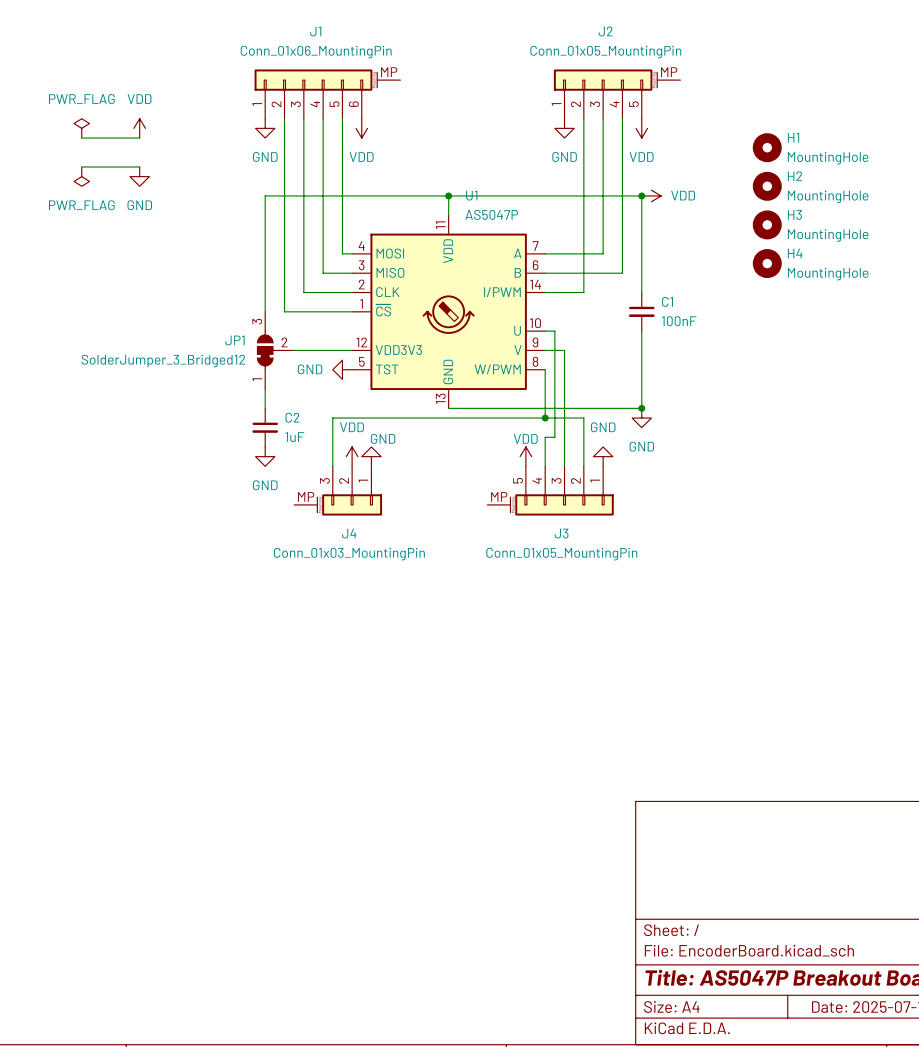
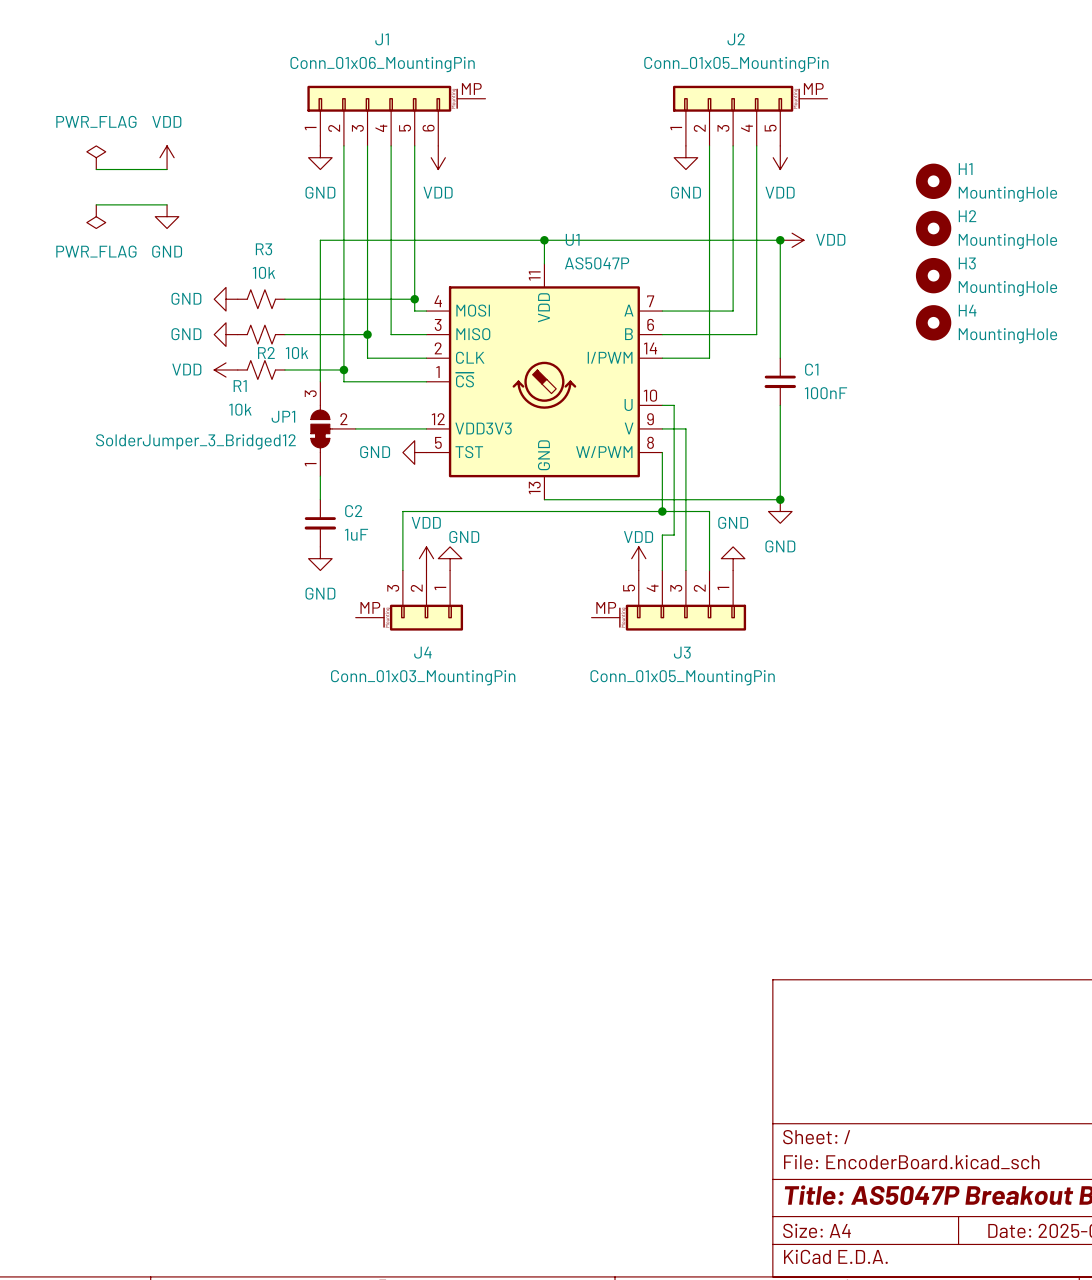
power symbol: none -> GND (226, 299)
R3: none -> 10k (261, 299)
wire: none -> (284, 299) (414, 299)
junction: none -> (414, 299)
power symbol: none -> GND (226, 334)
R2: none -> 10k (261, 334)
wire: none -> (284, 334) (367, 334)
junction: none -> (367, 334)
power symbol: none -> VDD (226, 369)
R1: none -> 10k (261, 369)
wire: none -> (284, 369) (343, 369)
junction: none -> (343, 369)

